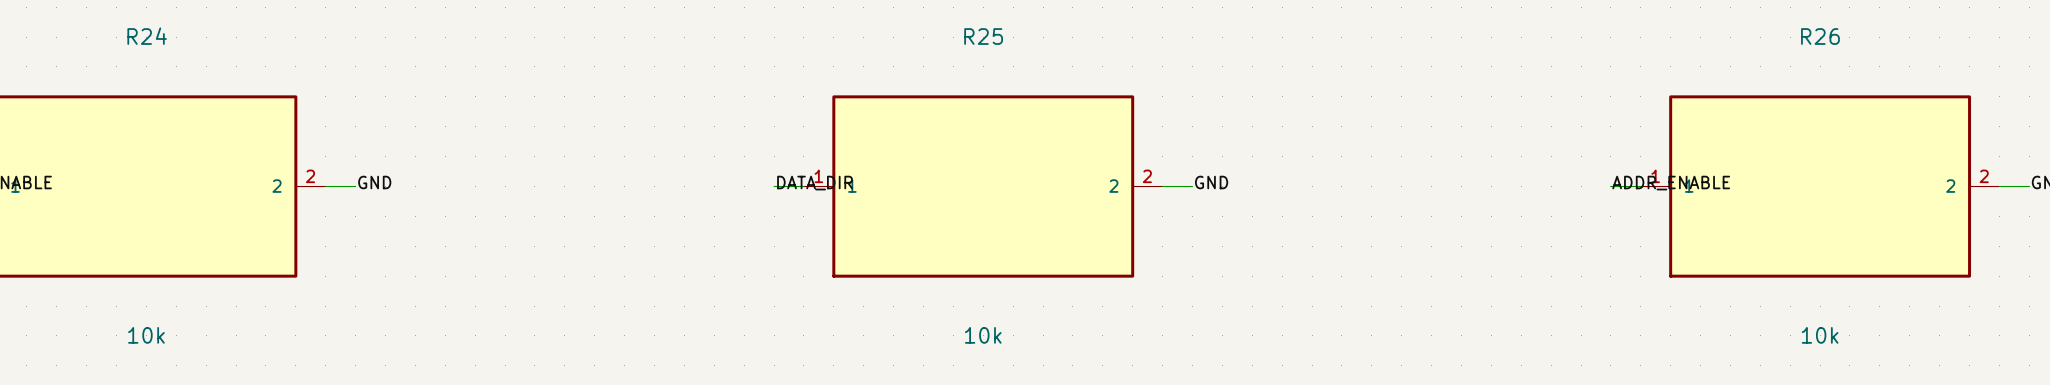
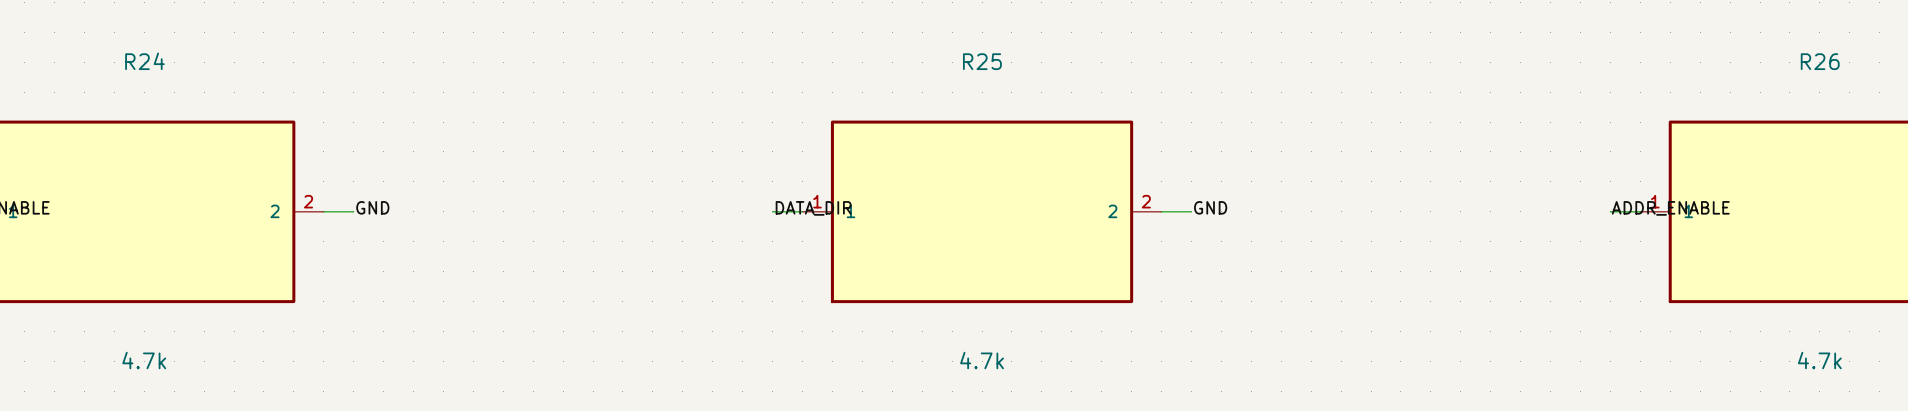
R24 value: 10k (146, 335) -> 4.7k (144, 360)
R25 value: 10k (983, 335) -> 4.7k (982, 360)
R26 value: 10k (1820, 335) -> 4.7k (1819, 360)

